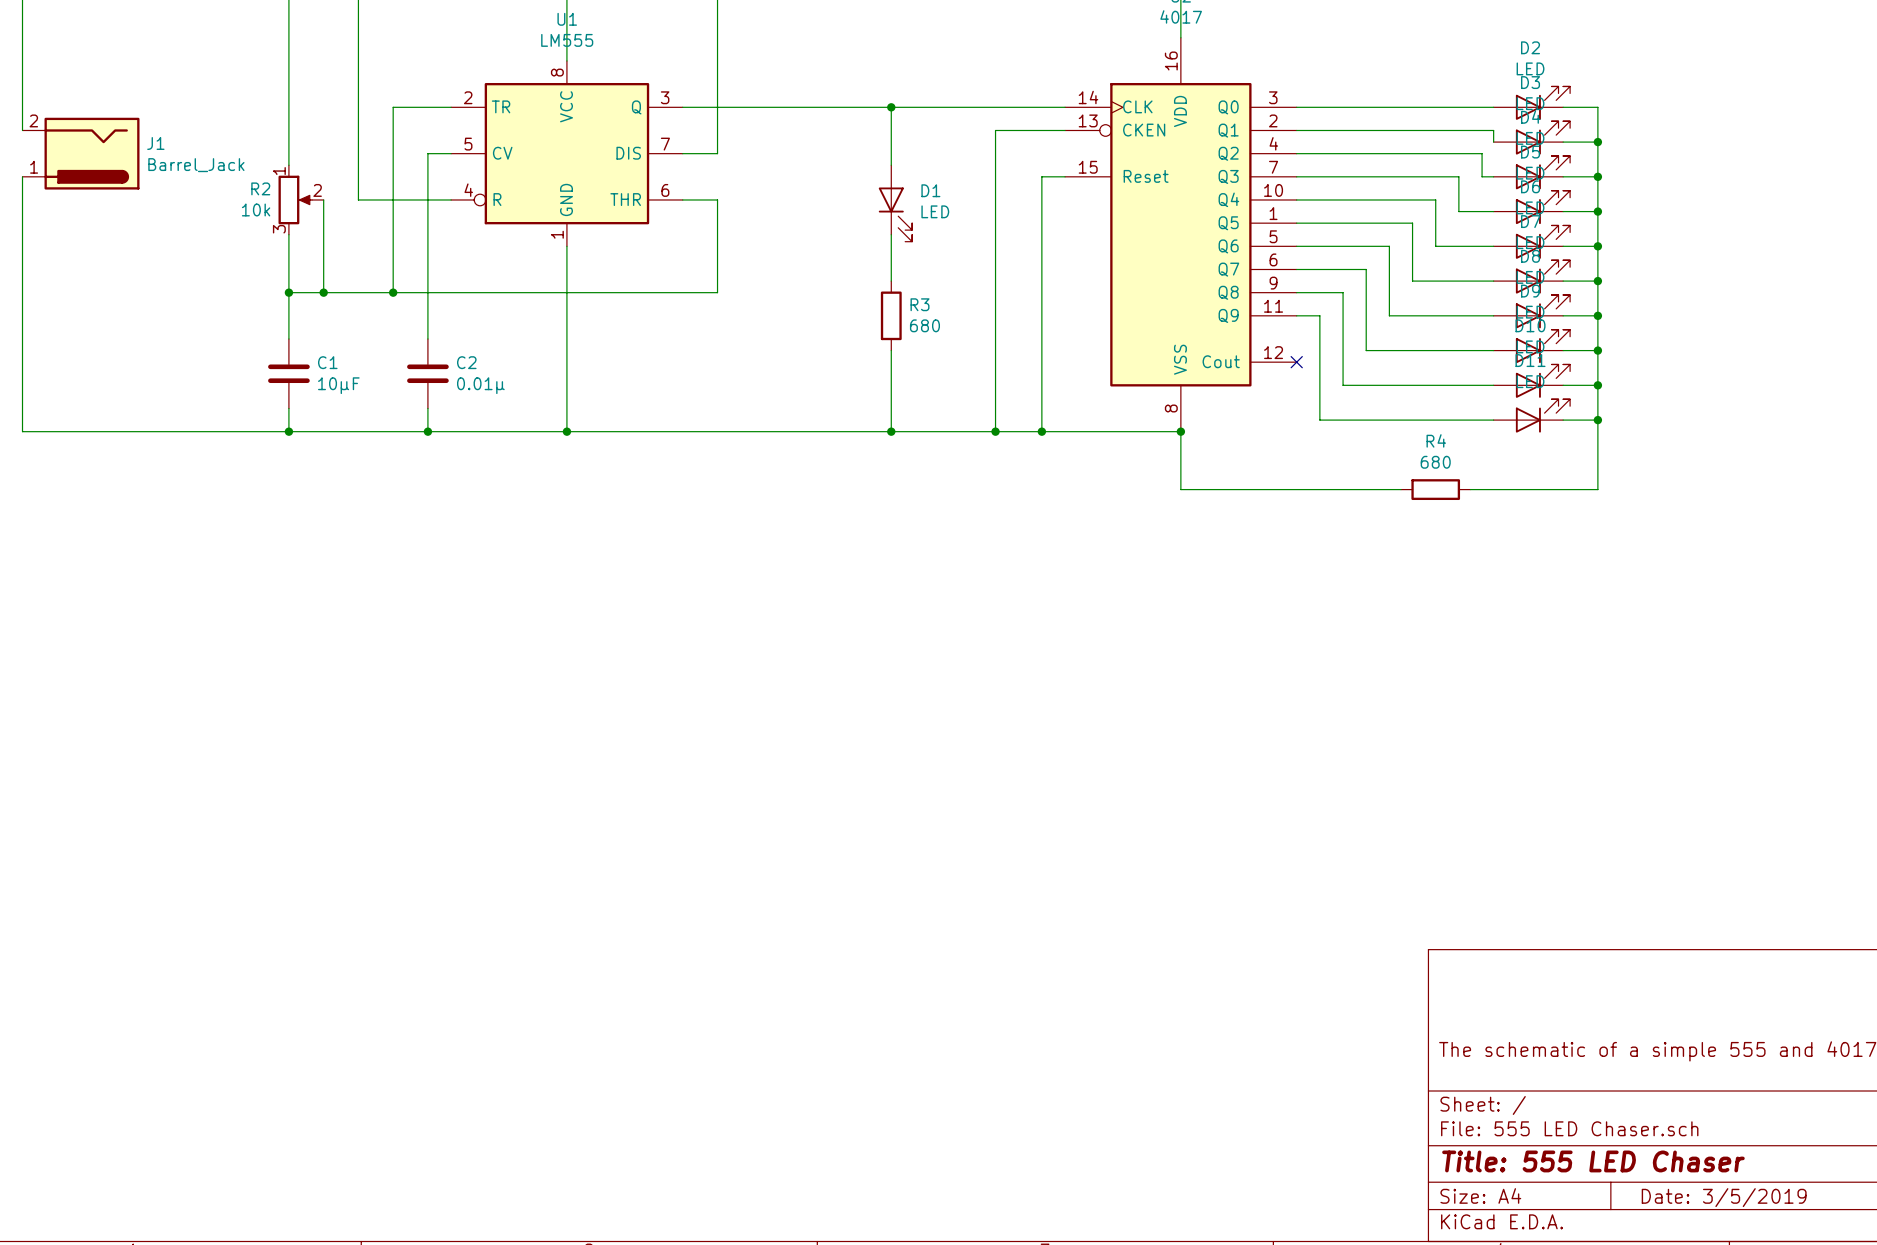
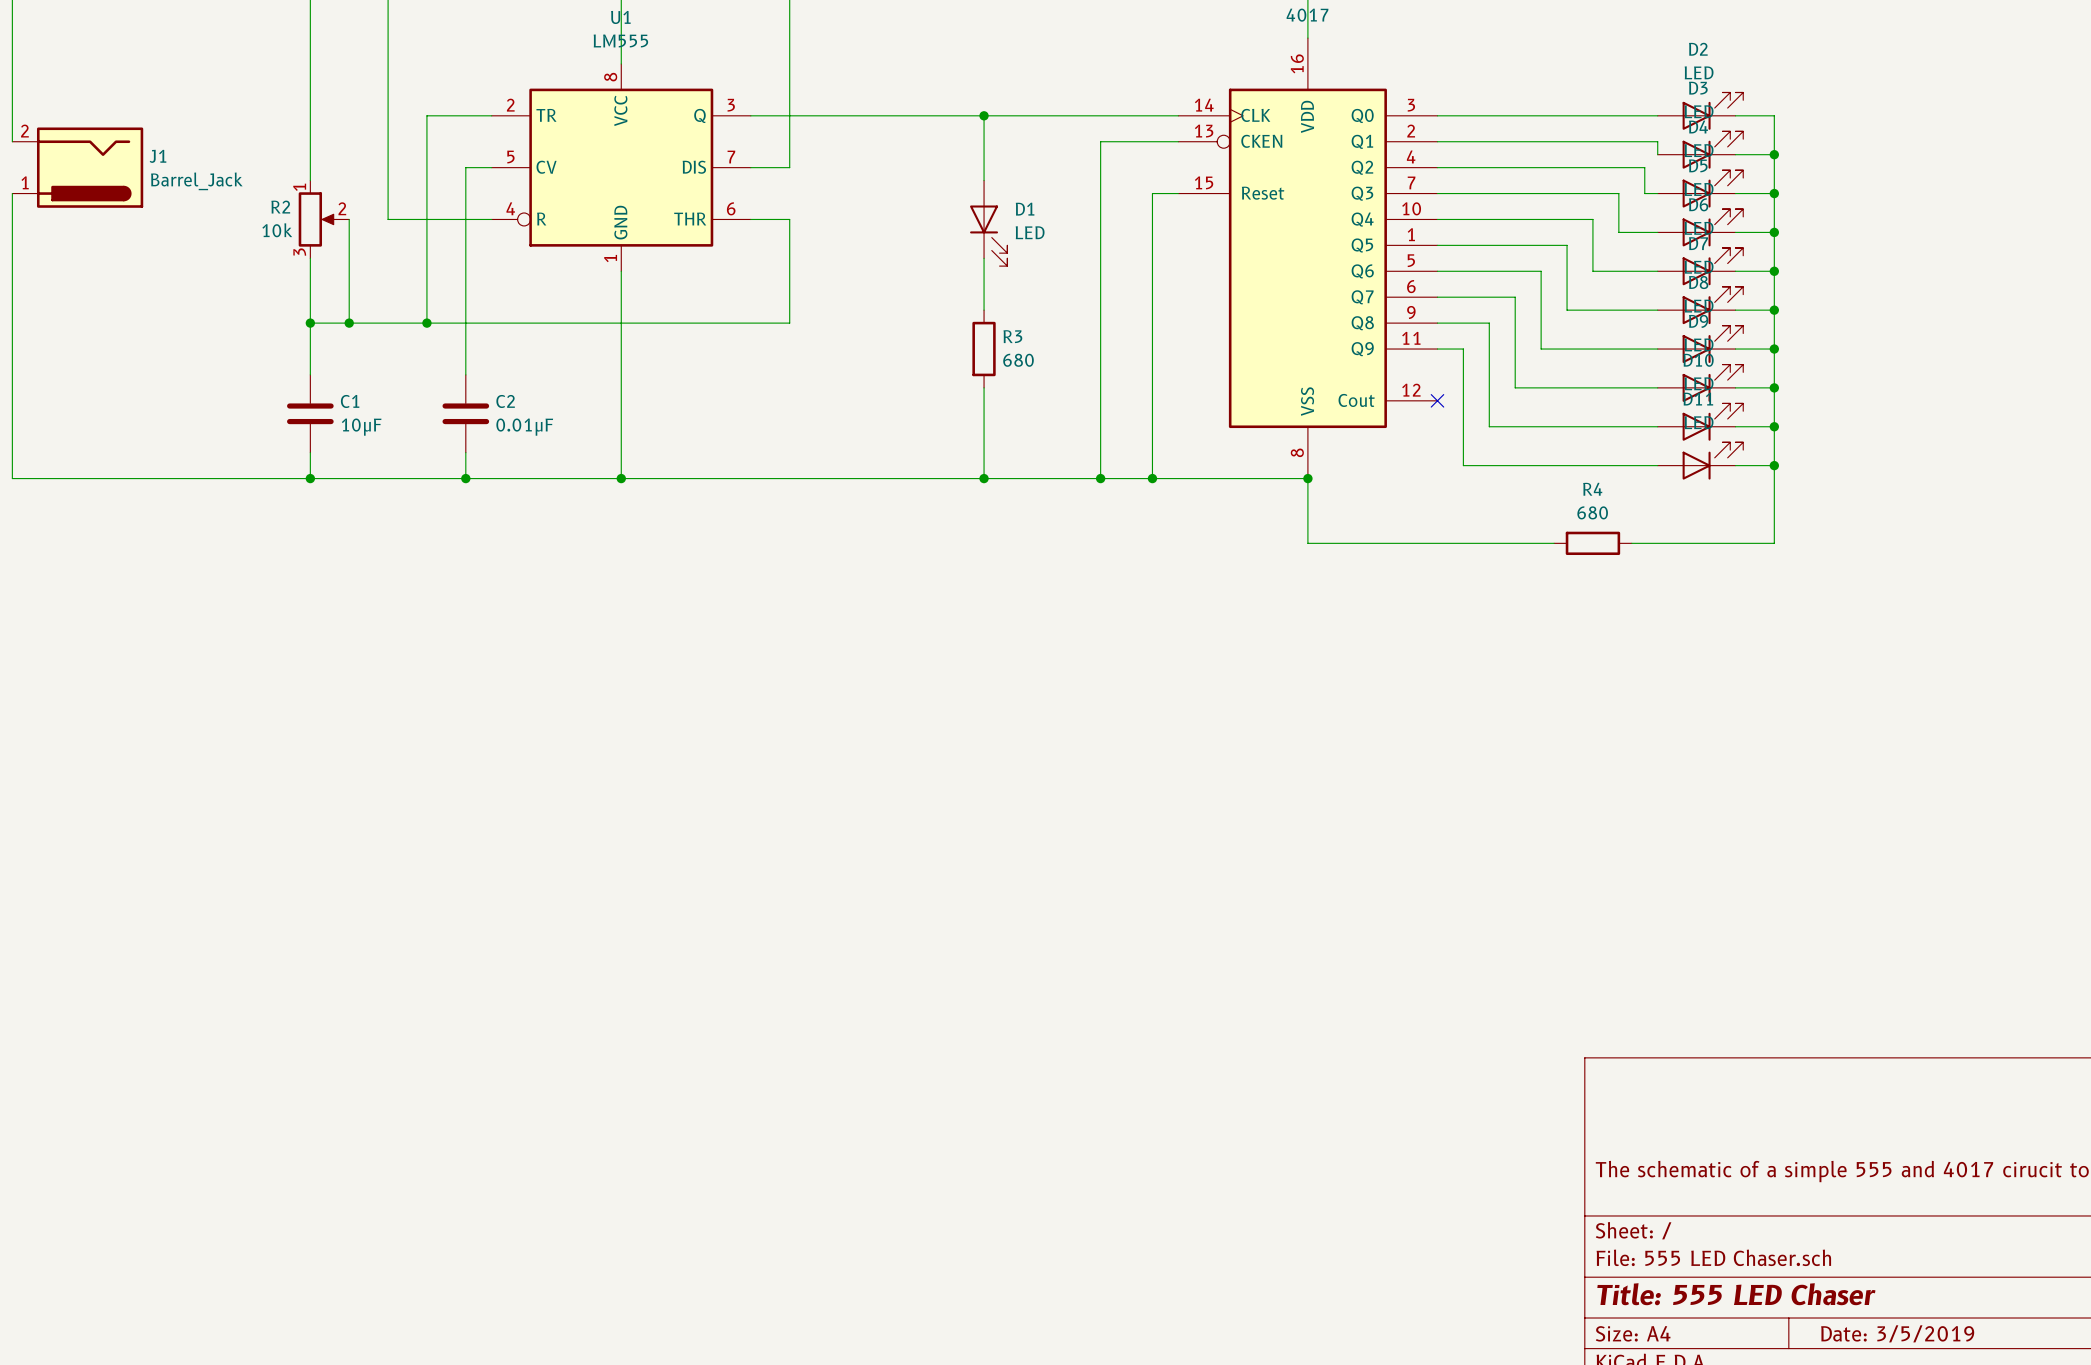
C2 value: 0.01μ (480, 385) -> 0.01μF (524, 427)

